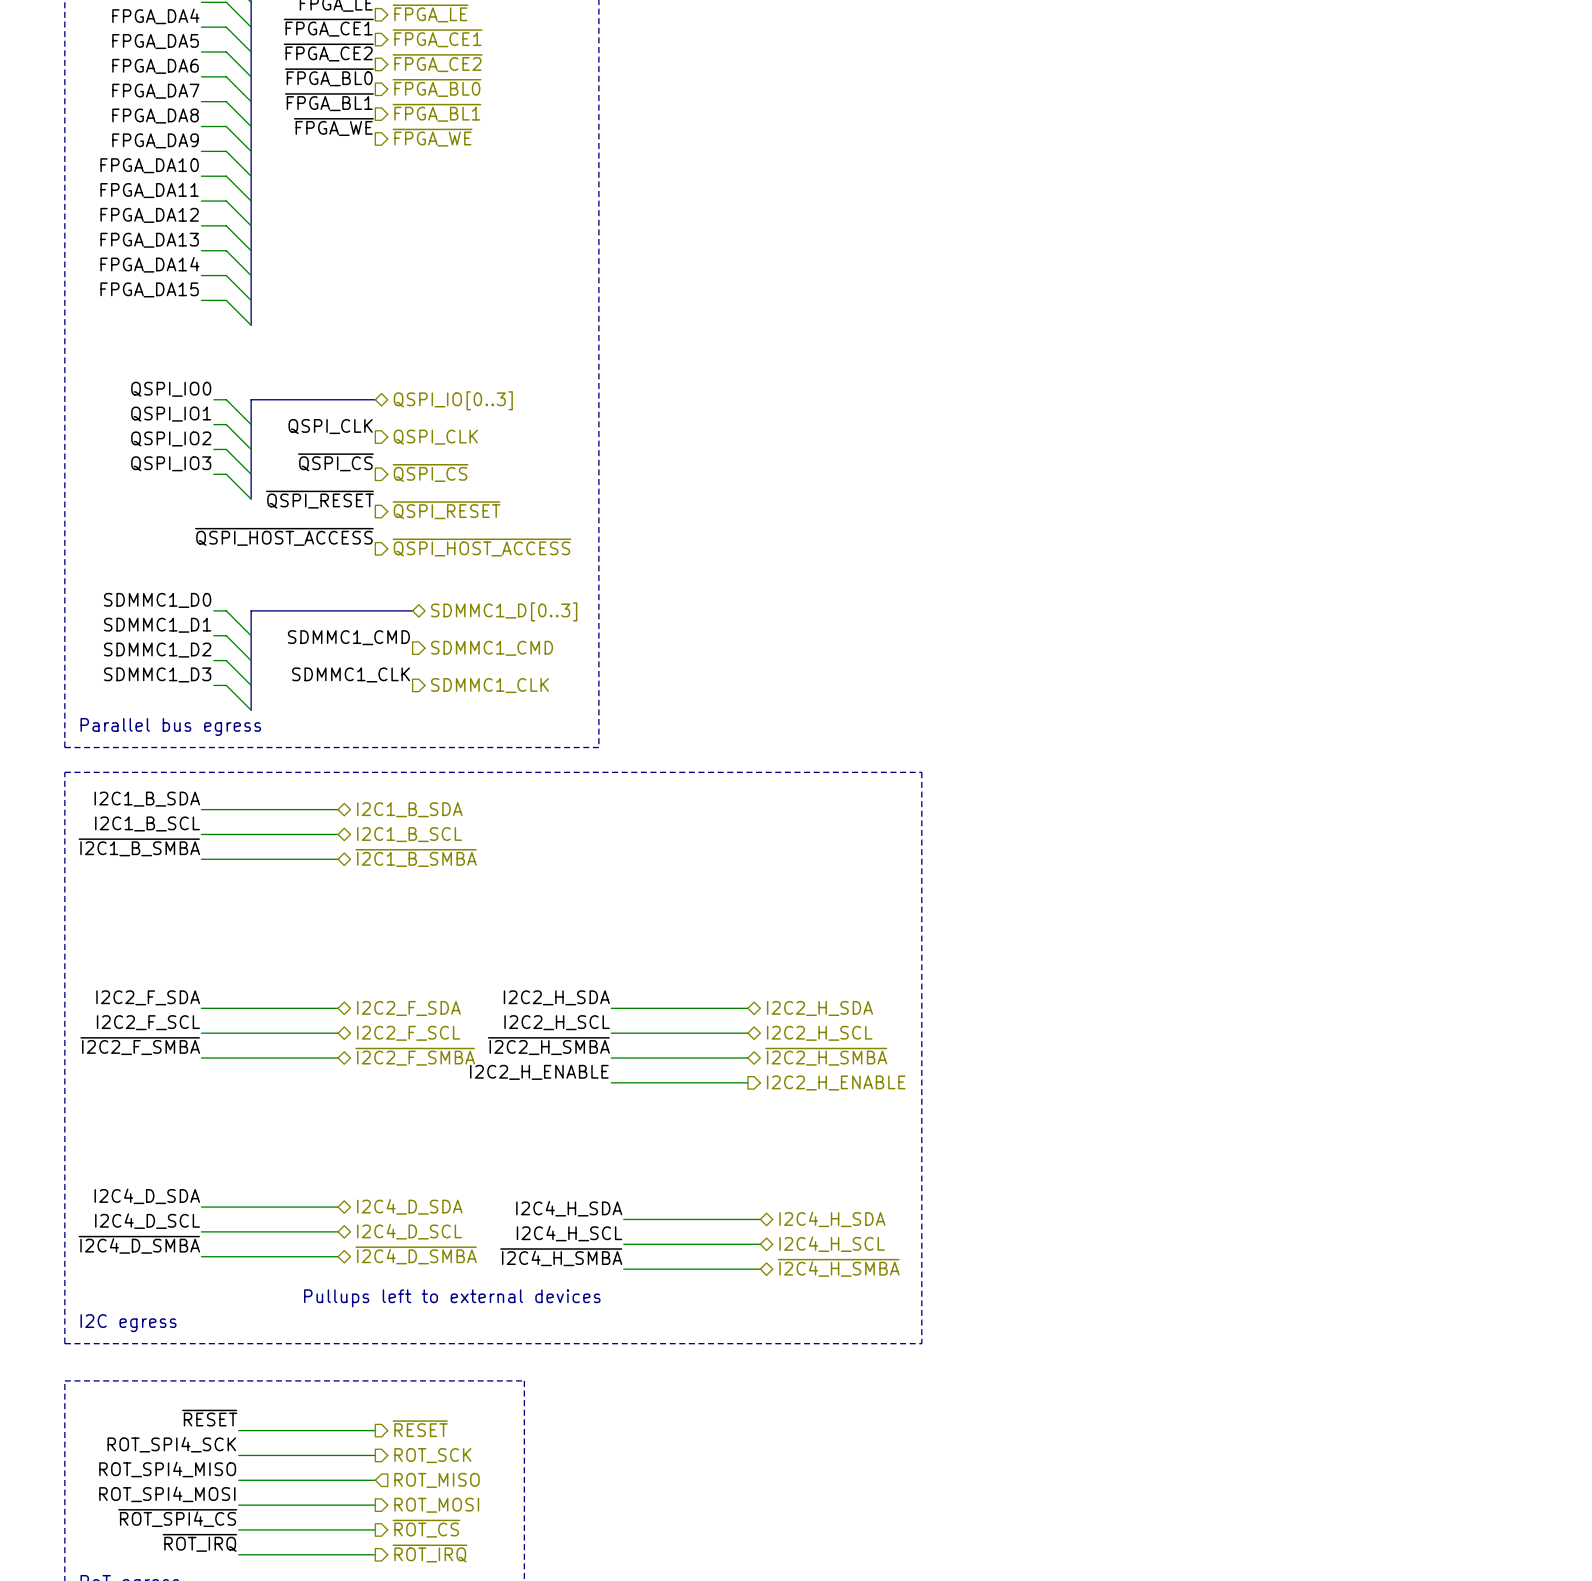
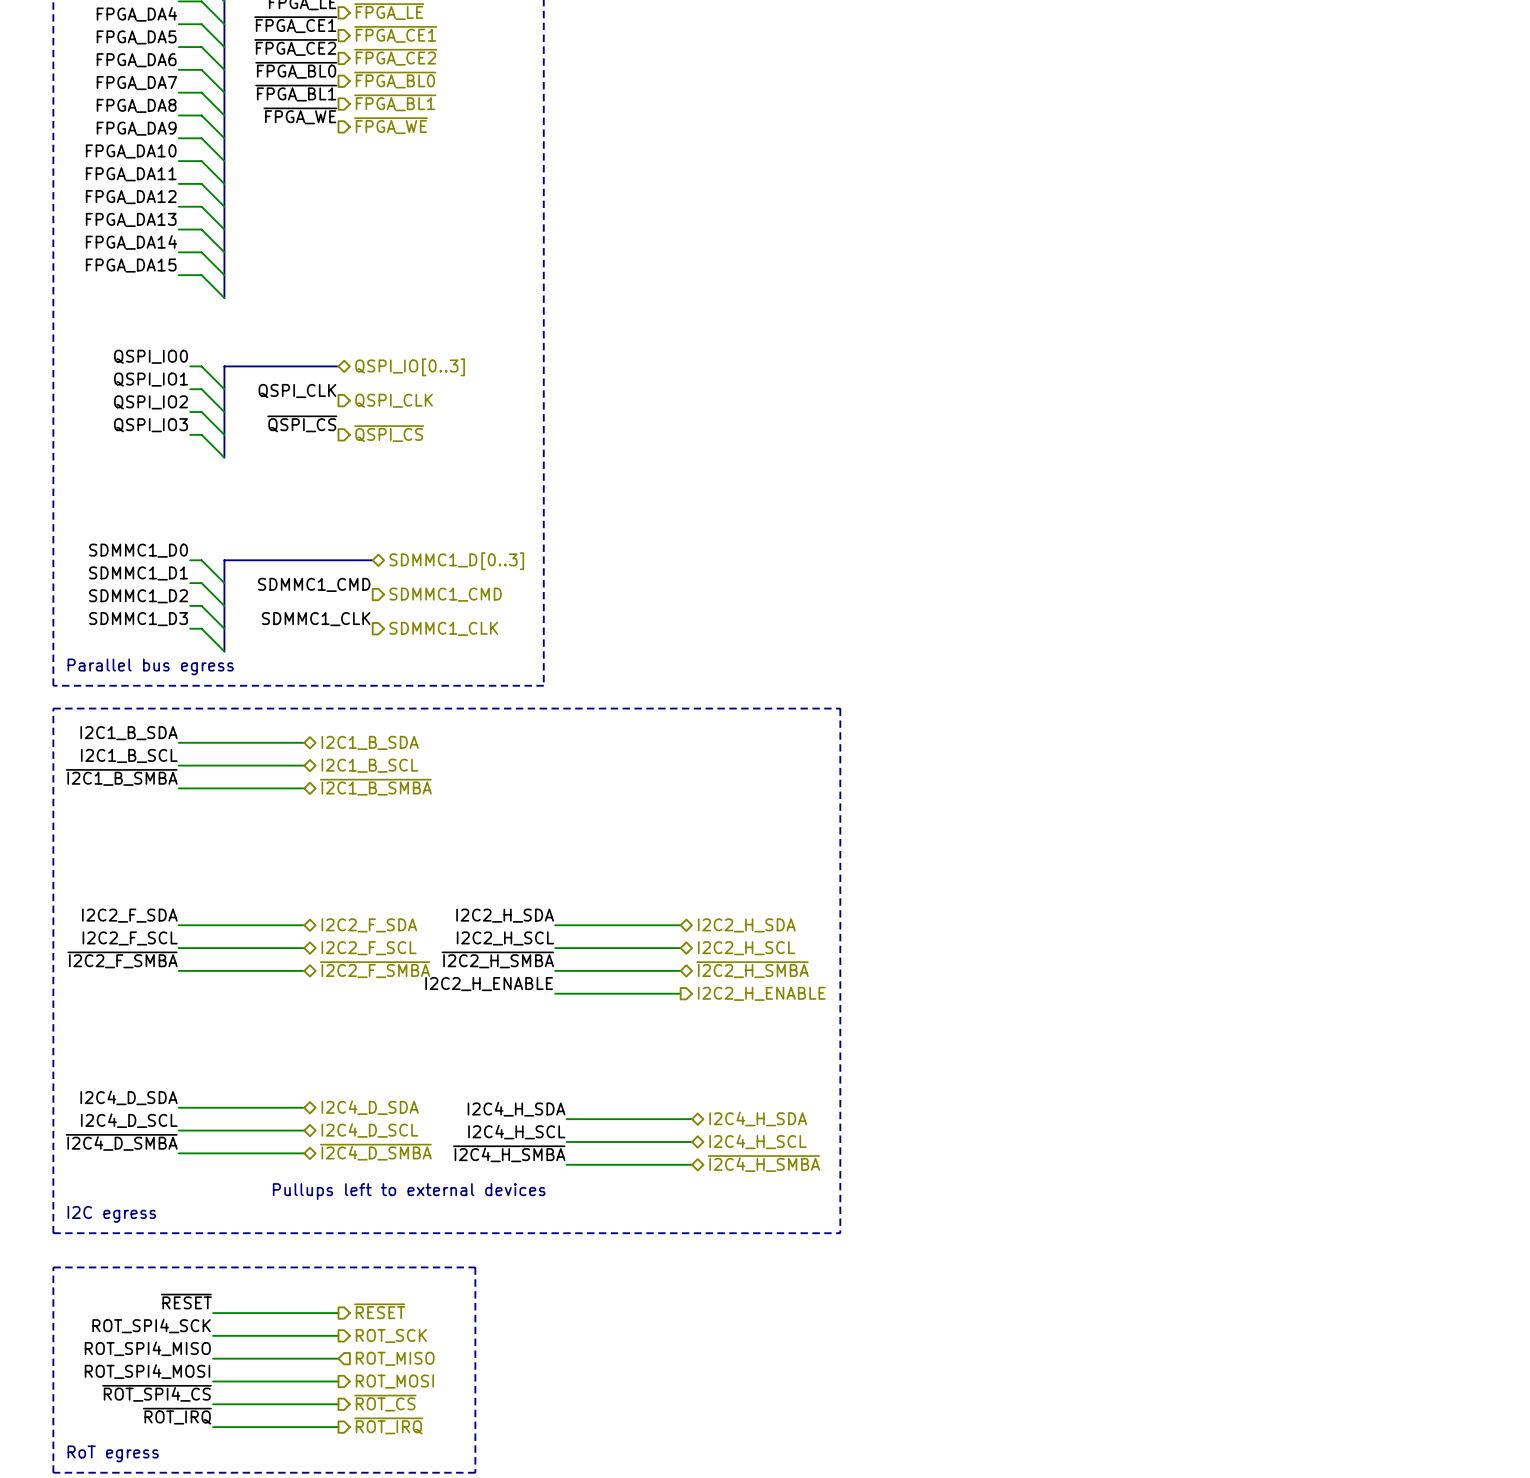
label: ~{QSPI_RESET} (319, 499) -> none
hierarchical label: ~{QSPI_RESET} (446, 510) -> none
label: ~{QSPI_HOST_ACCESS} (284, 536) -> none
hierarchical label: ~{QSPI_HOST_ACCESS} (481, 547) -> none

